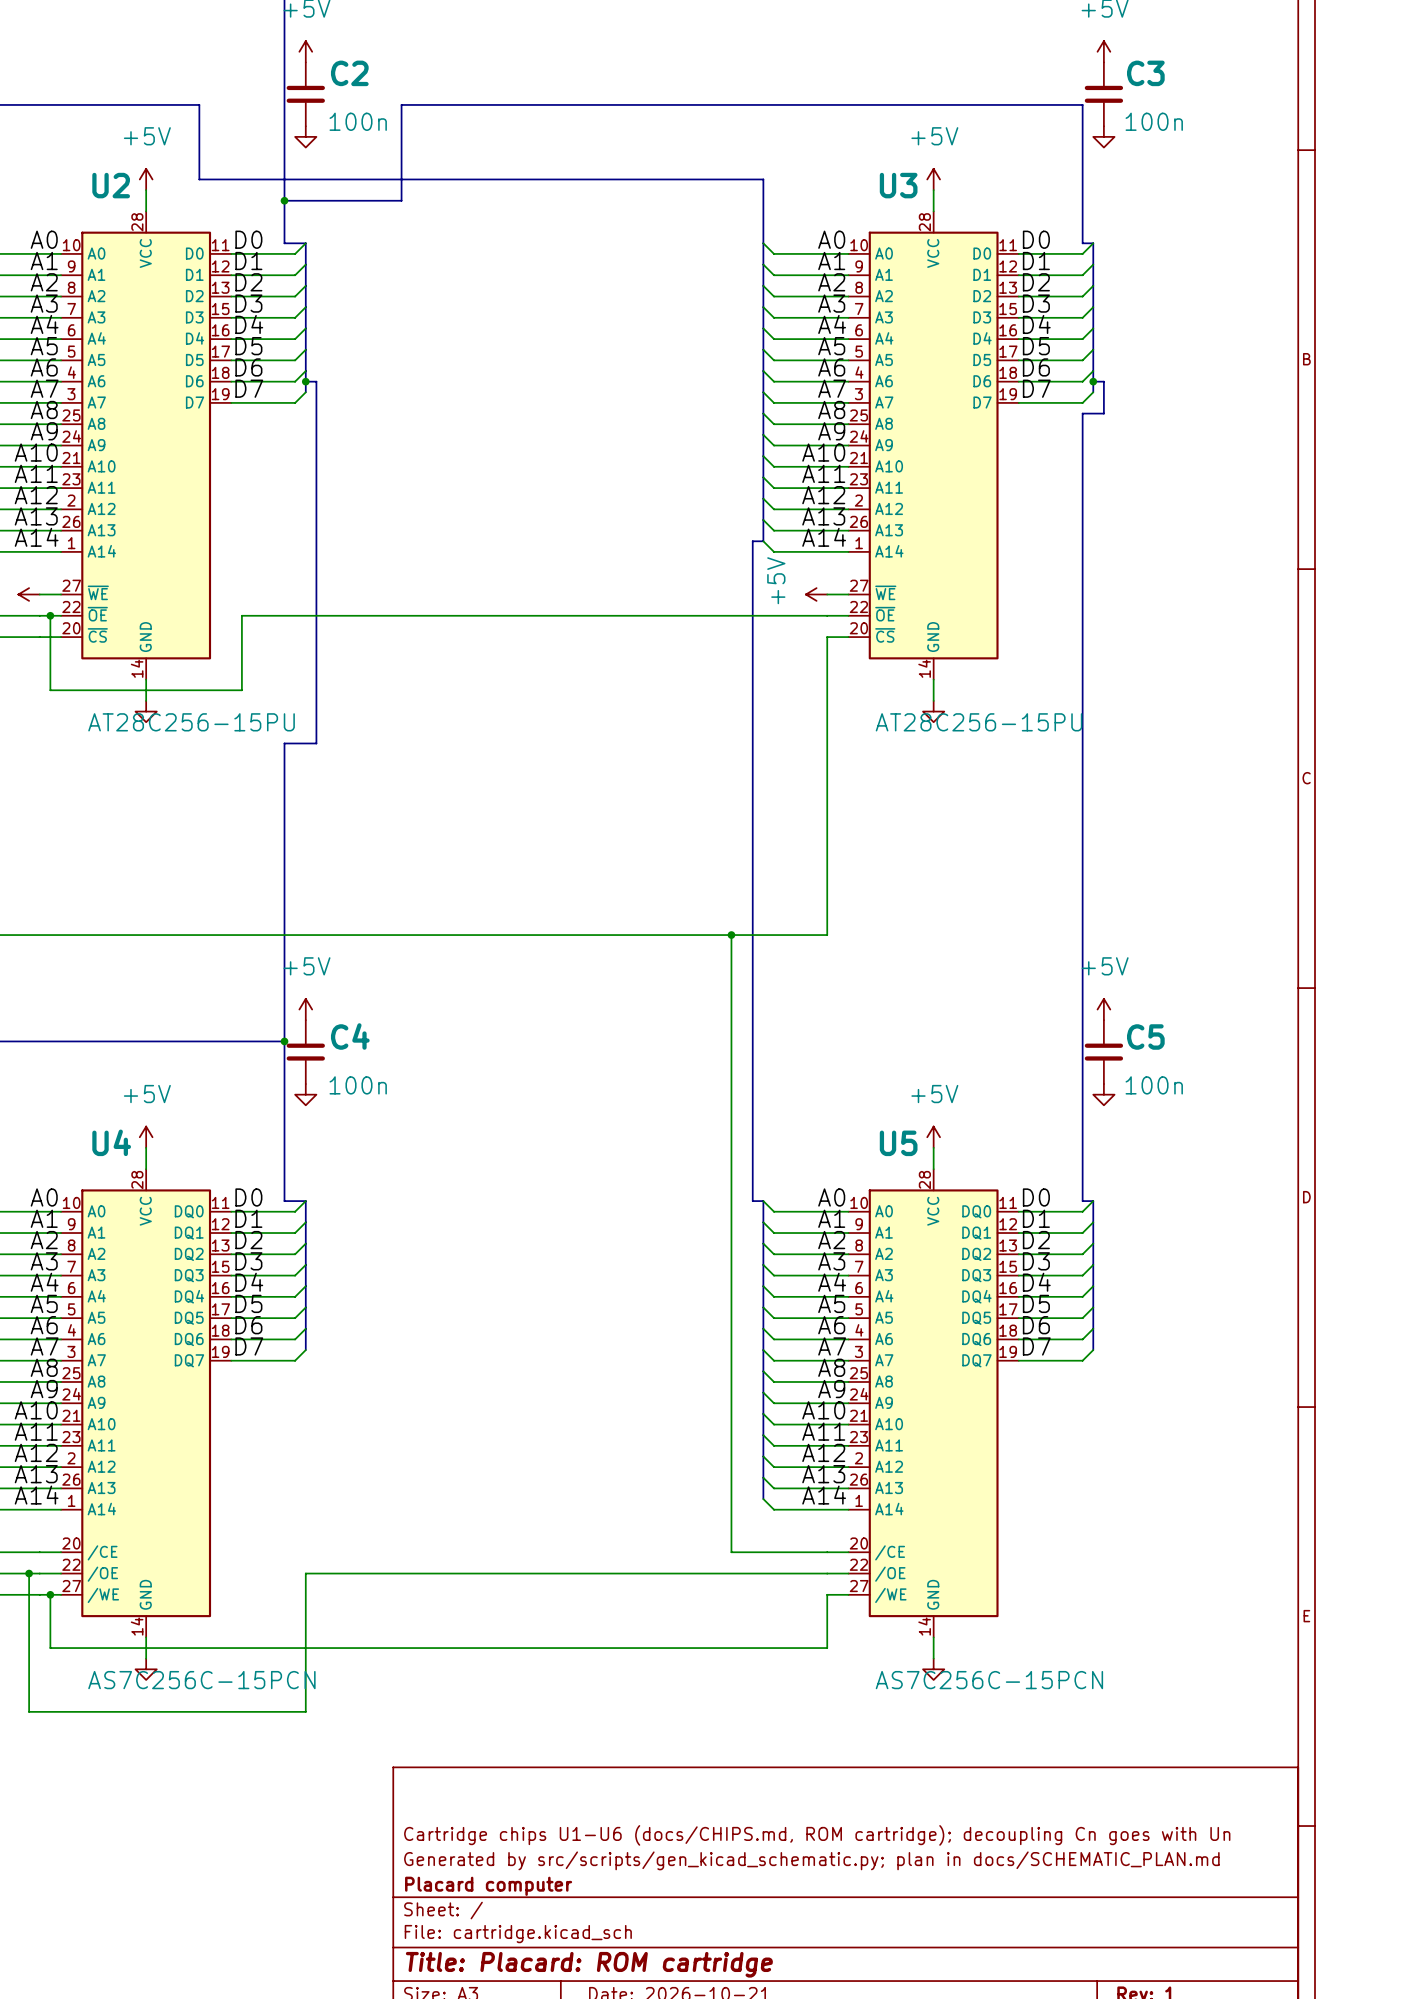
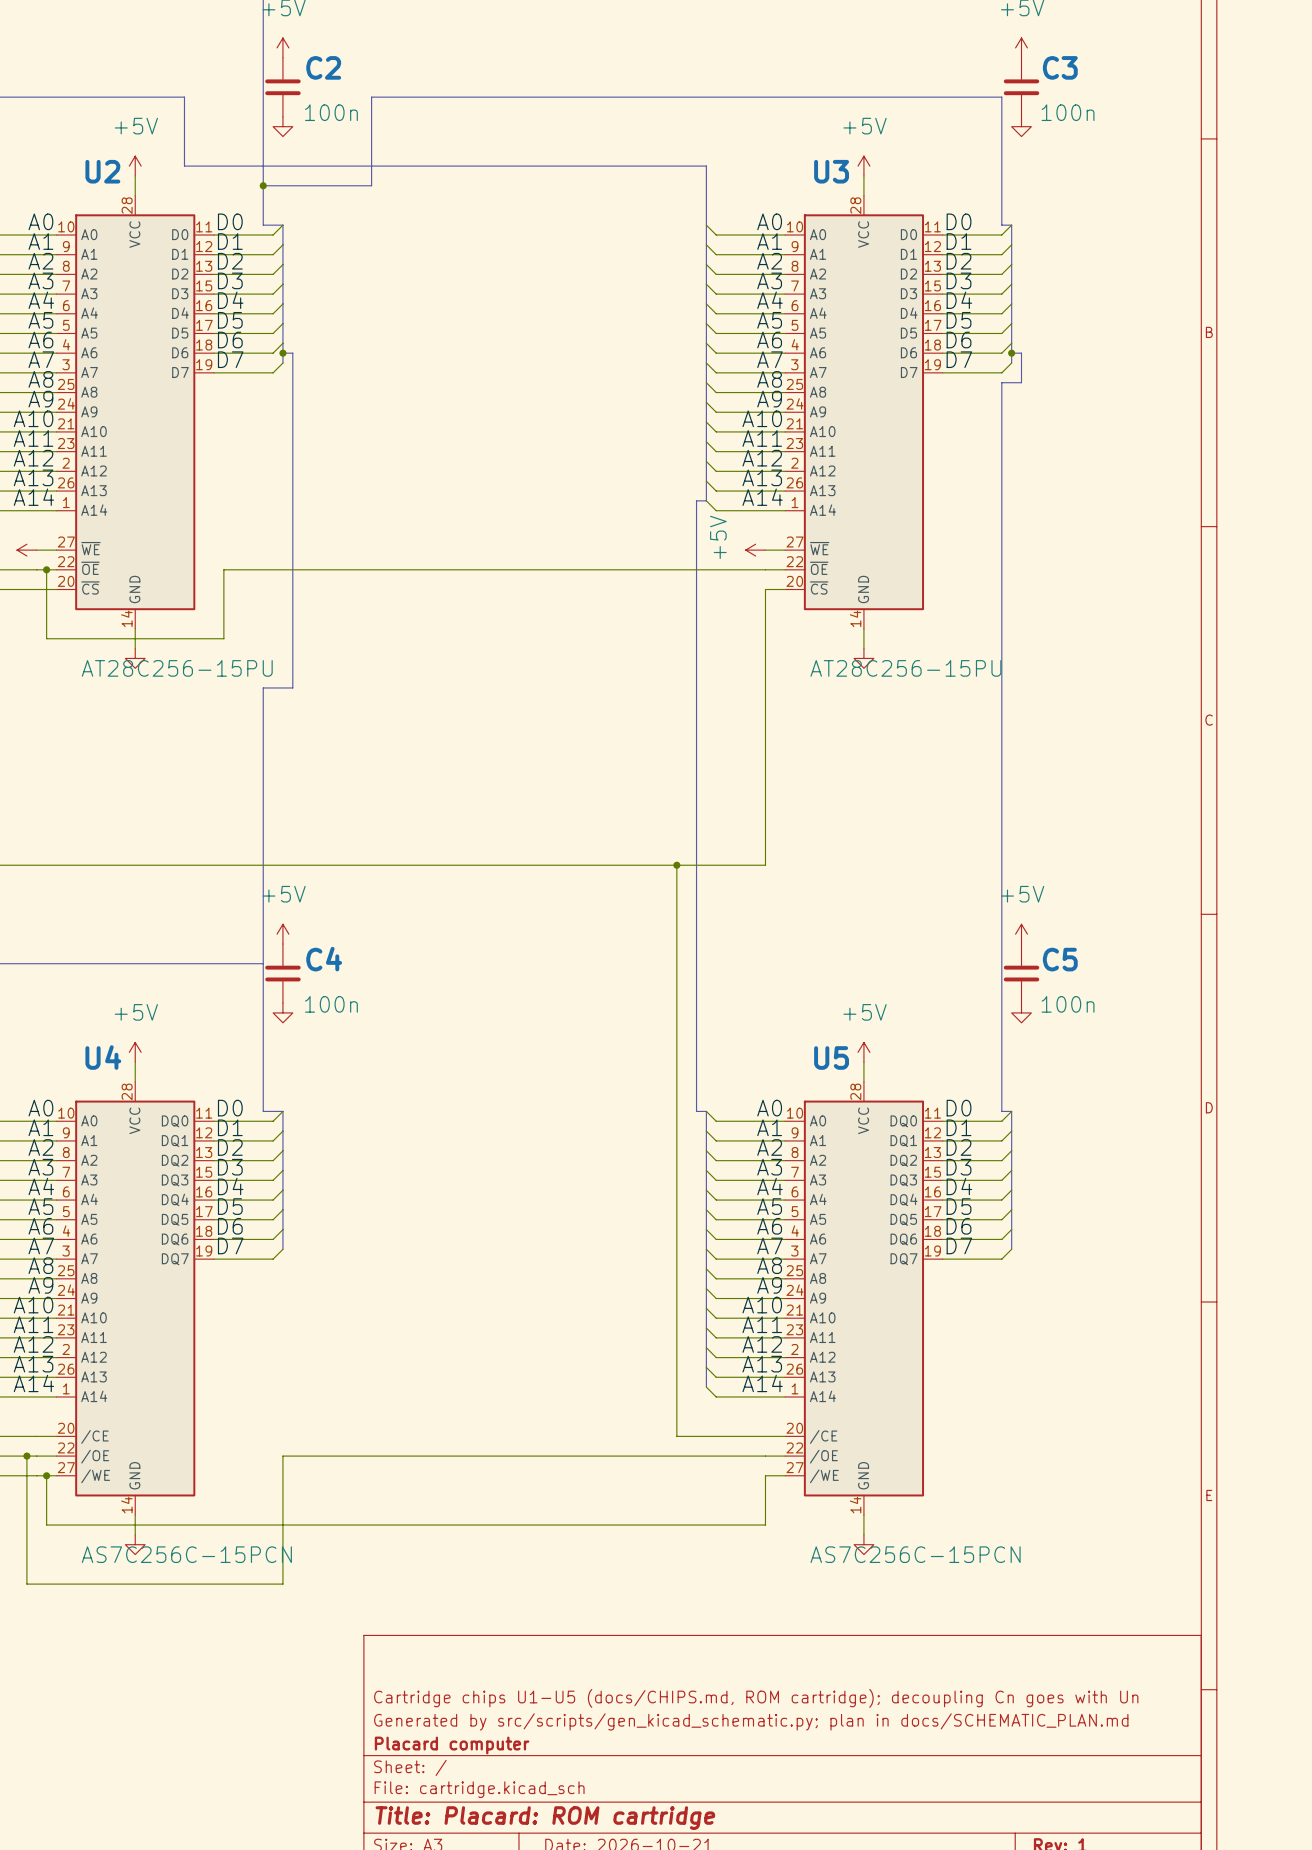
junction: (284, 1041) -> none
title block: Cartridge chips U1-U6 (docs/CHIPS.md, ROM cartridge); decoupling Cn goes with Un (817, 1835) -> Cartridge chips U1-U5 (docs/CHIPS.md, ROM cartridge); decoupling Cn goes with Un (756, 1698)

